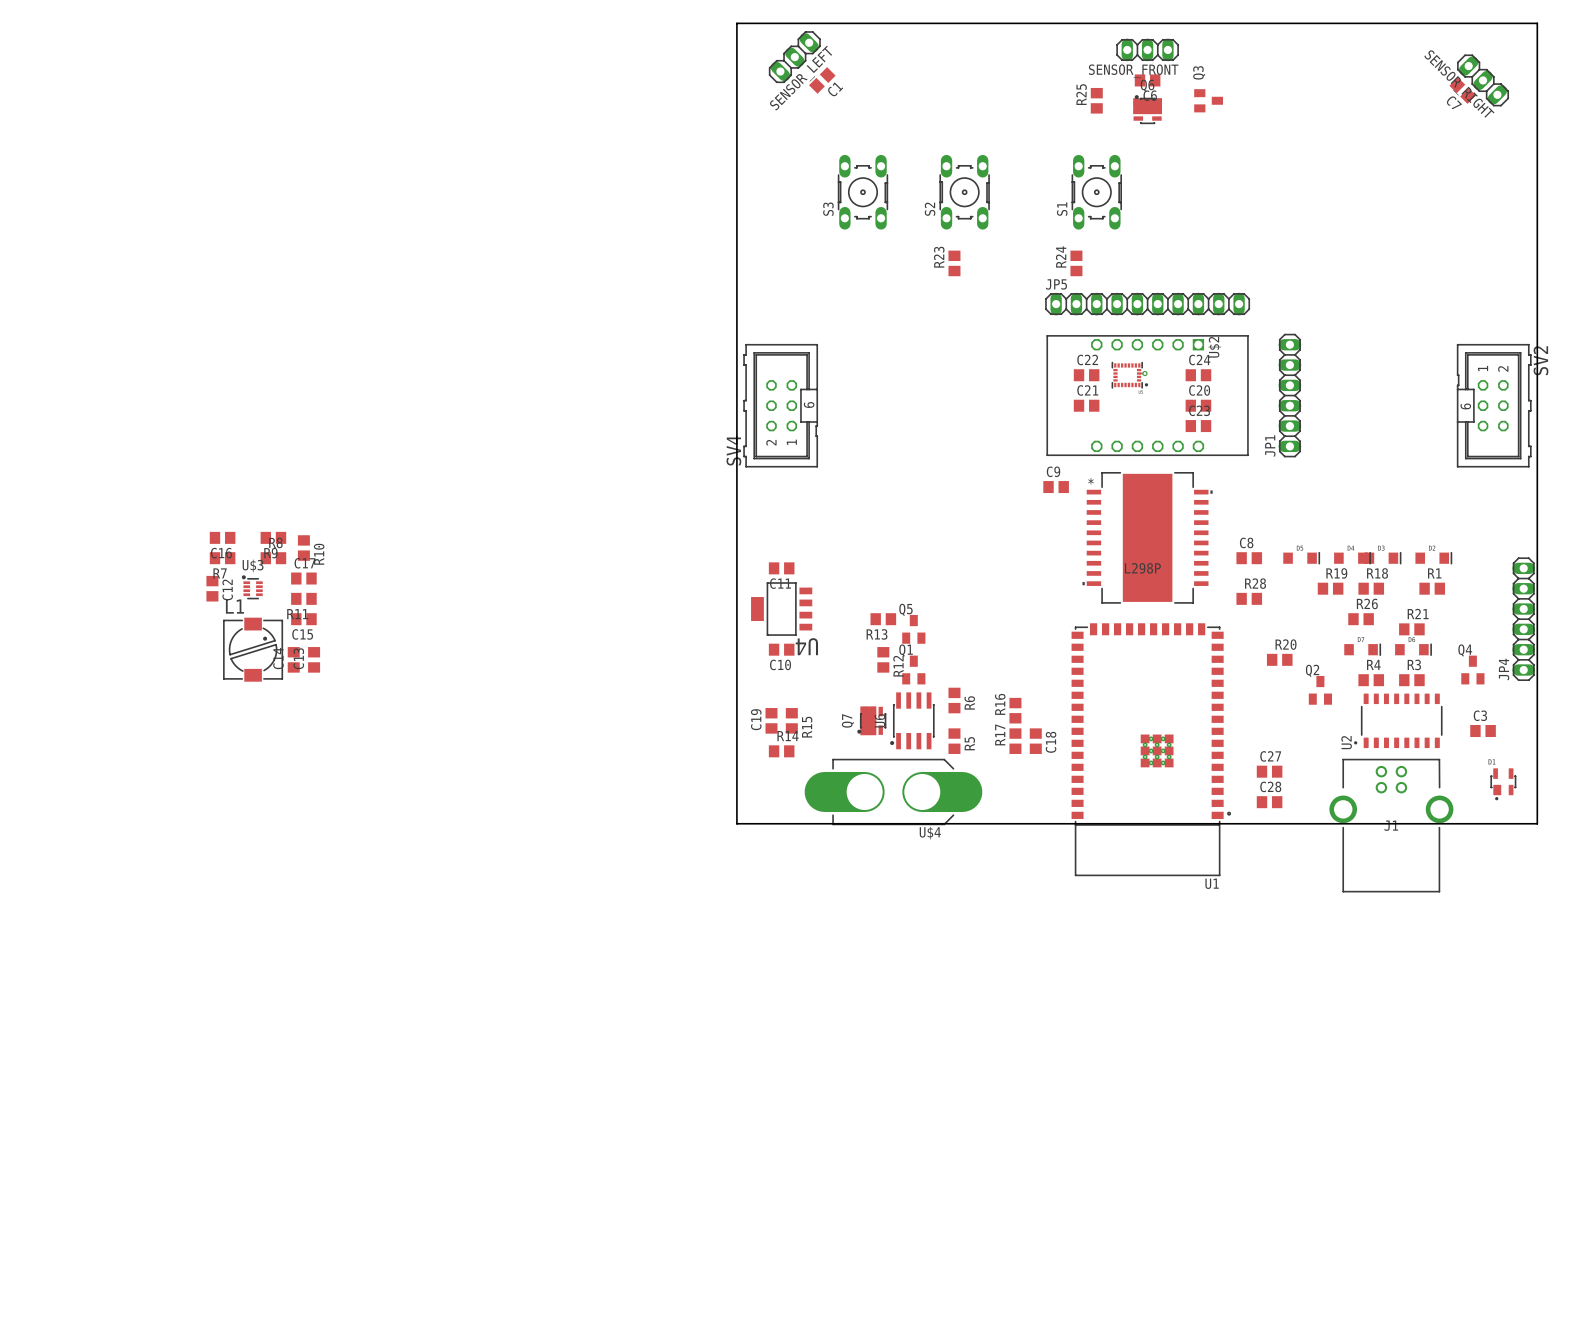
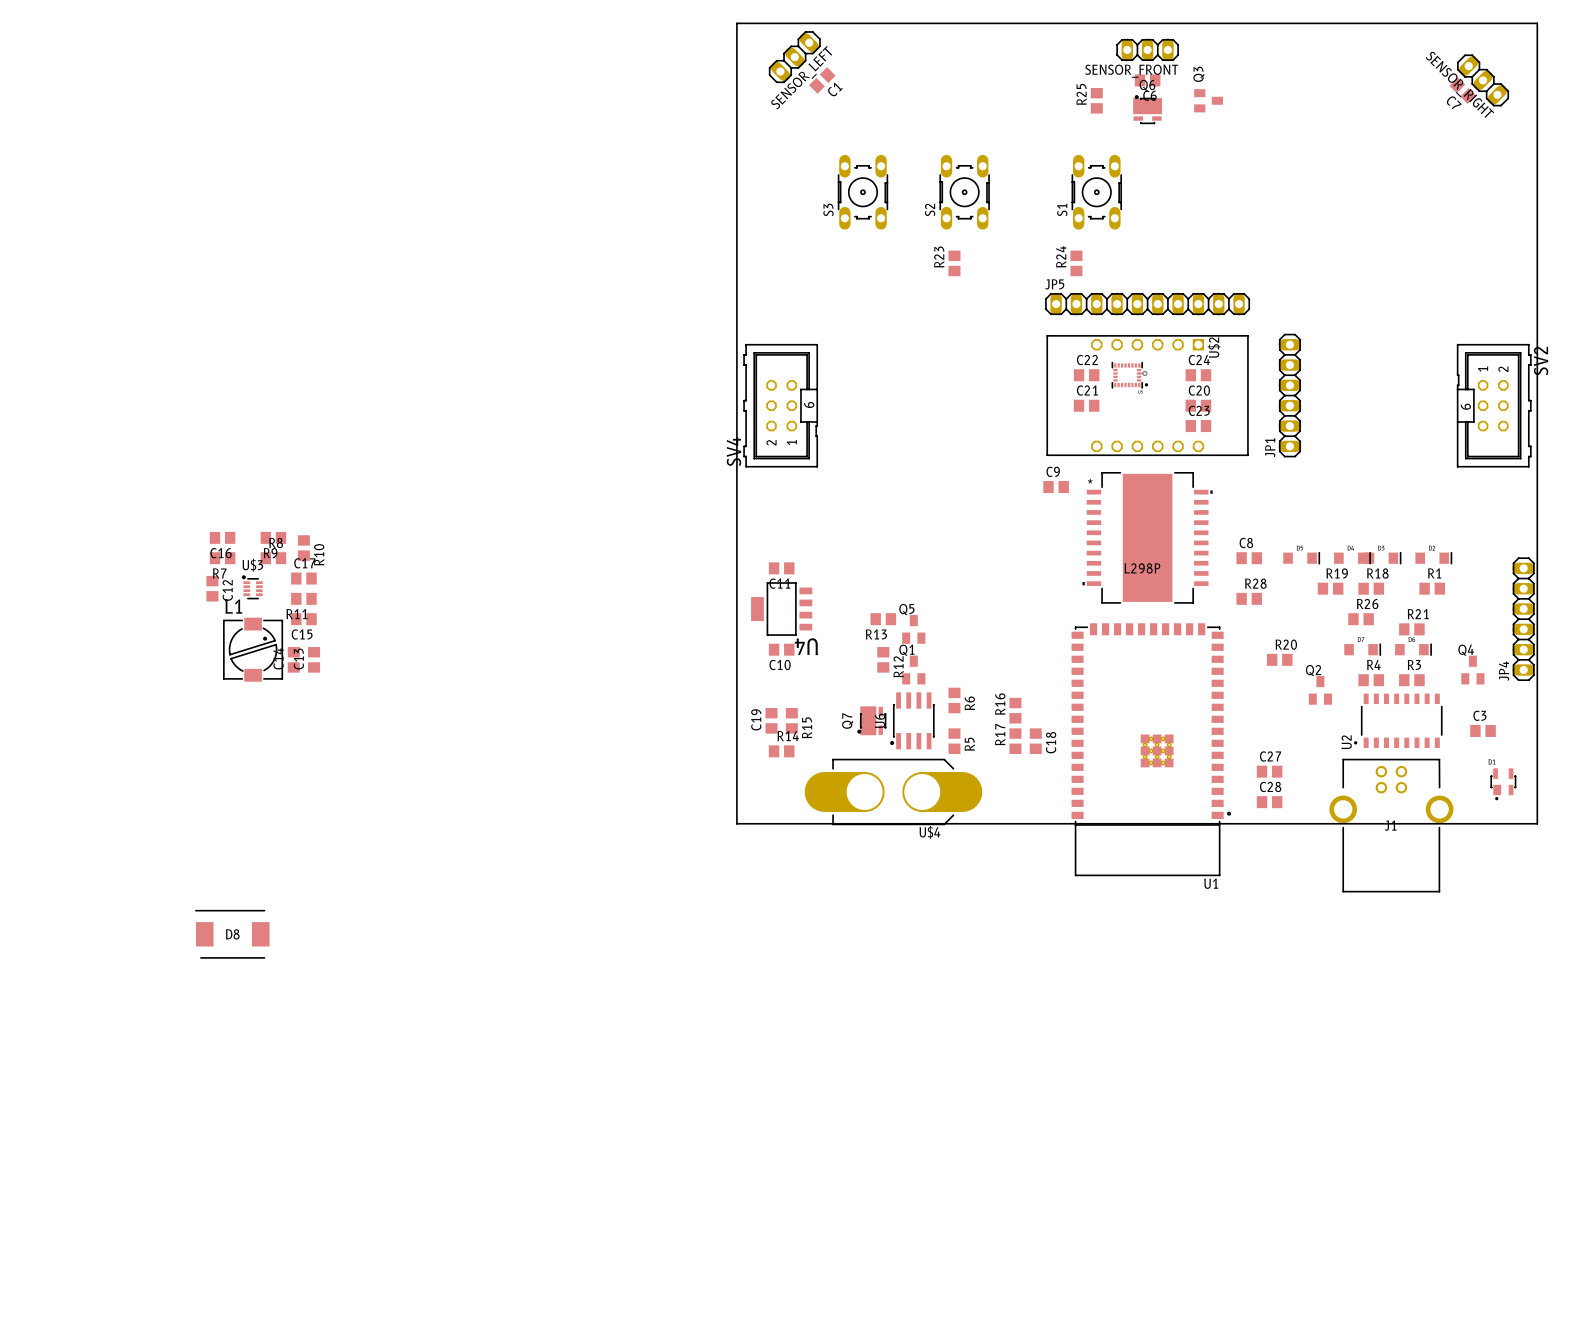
D8: none -> (232, 934)

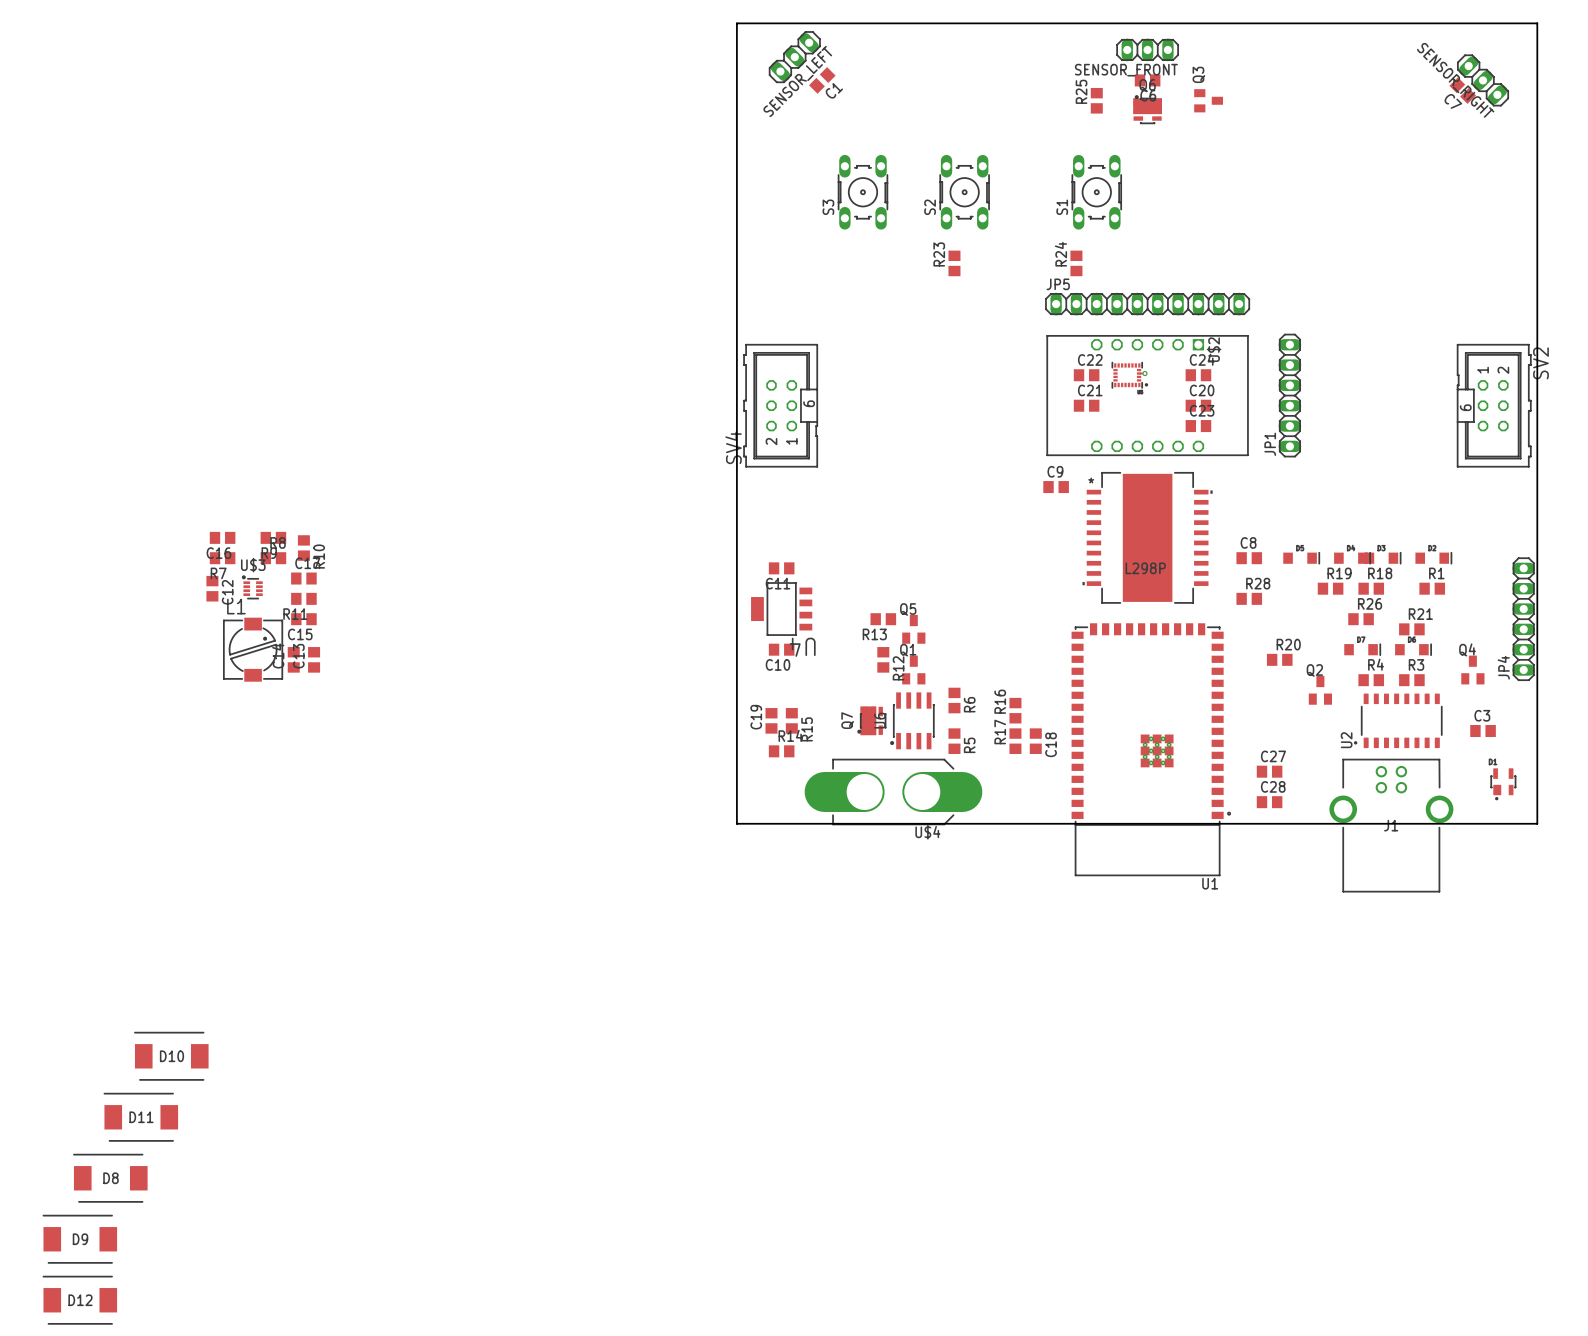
D8 position: (232, 934) -> (110, 1178)
D10: none -> (171, 1056)
D11: none -> (140, 1117)
D9: none -> (79, 1239)
D12: none -> (79, 1300)

